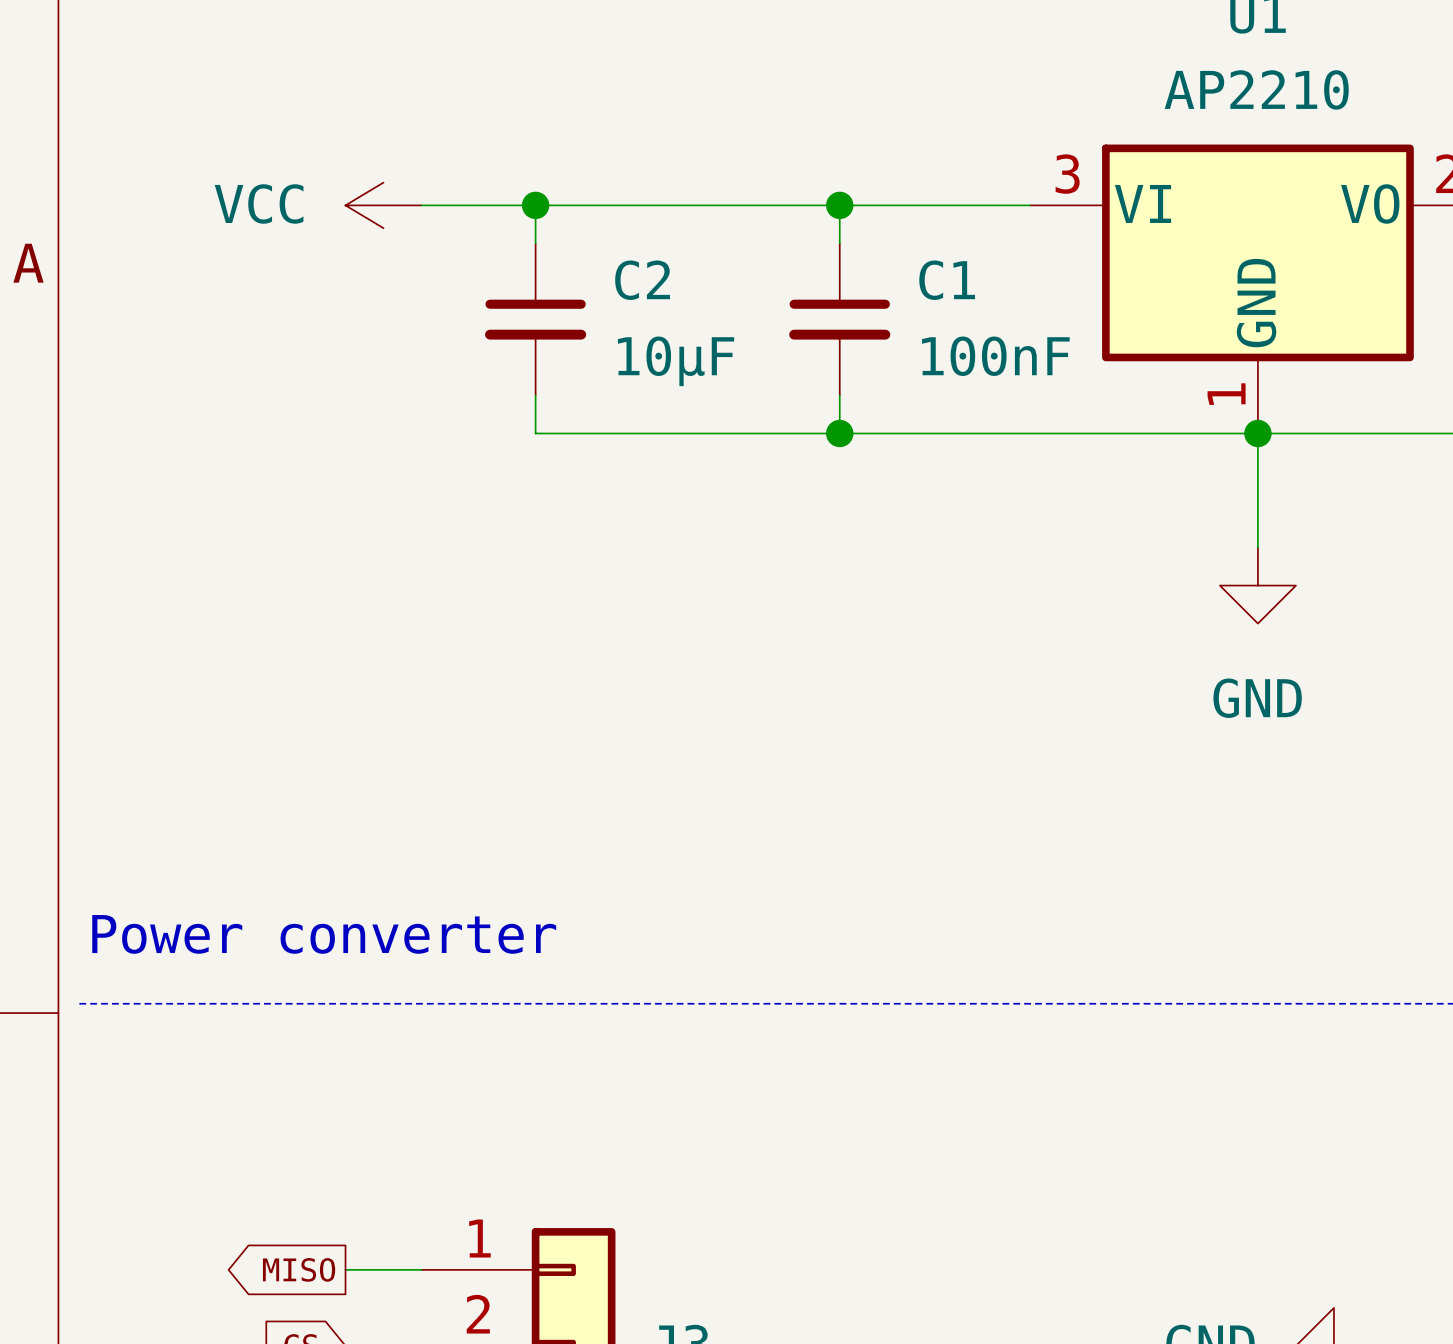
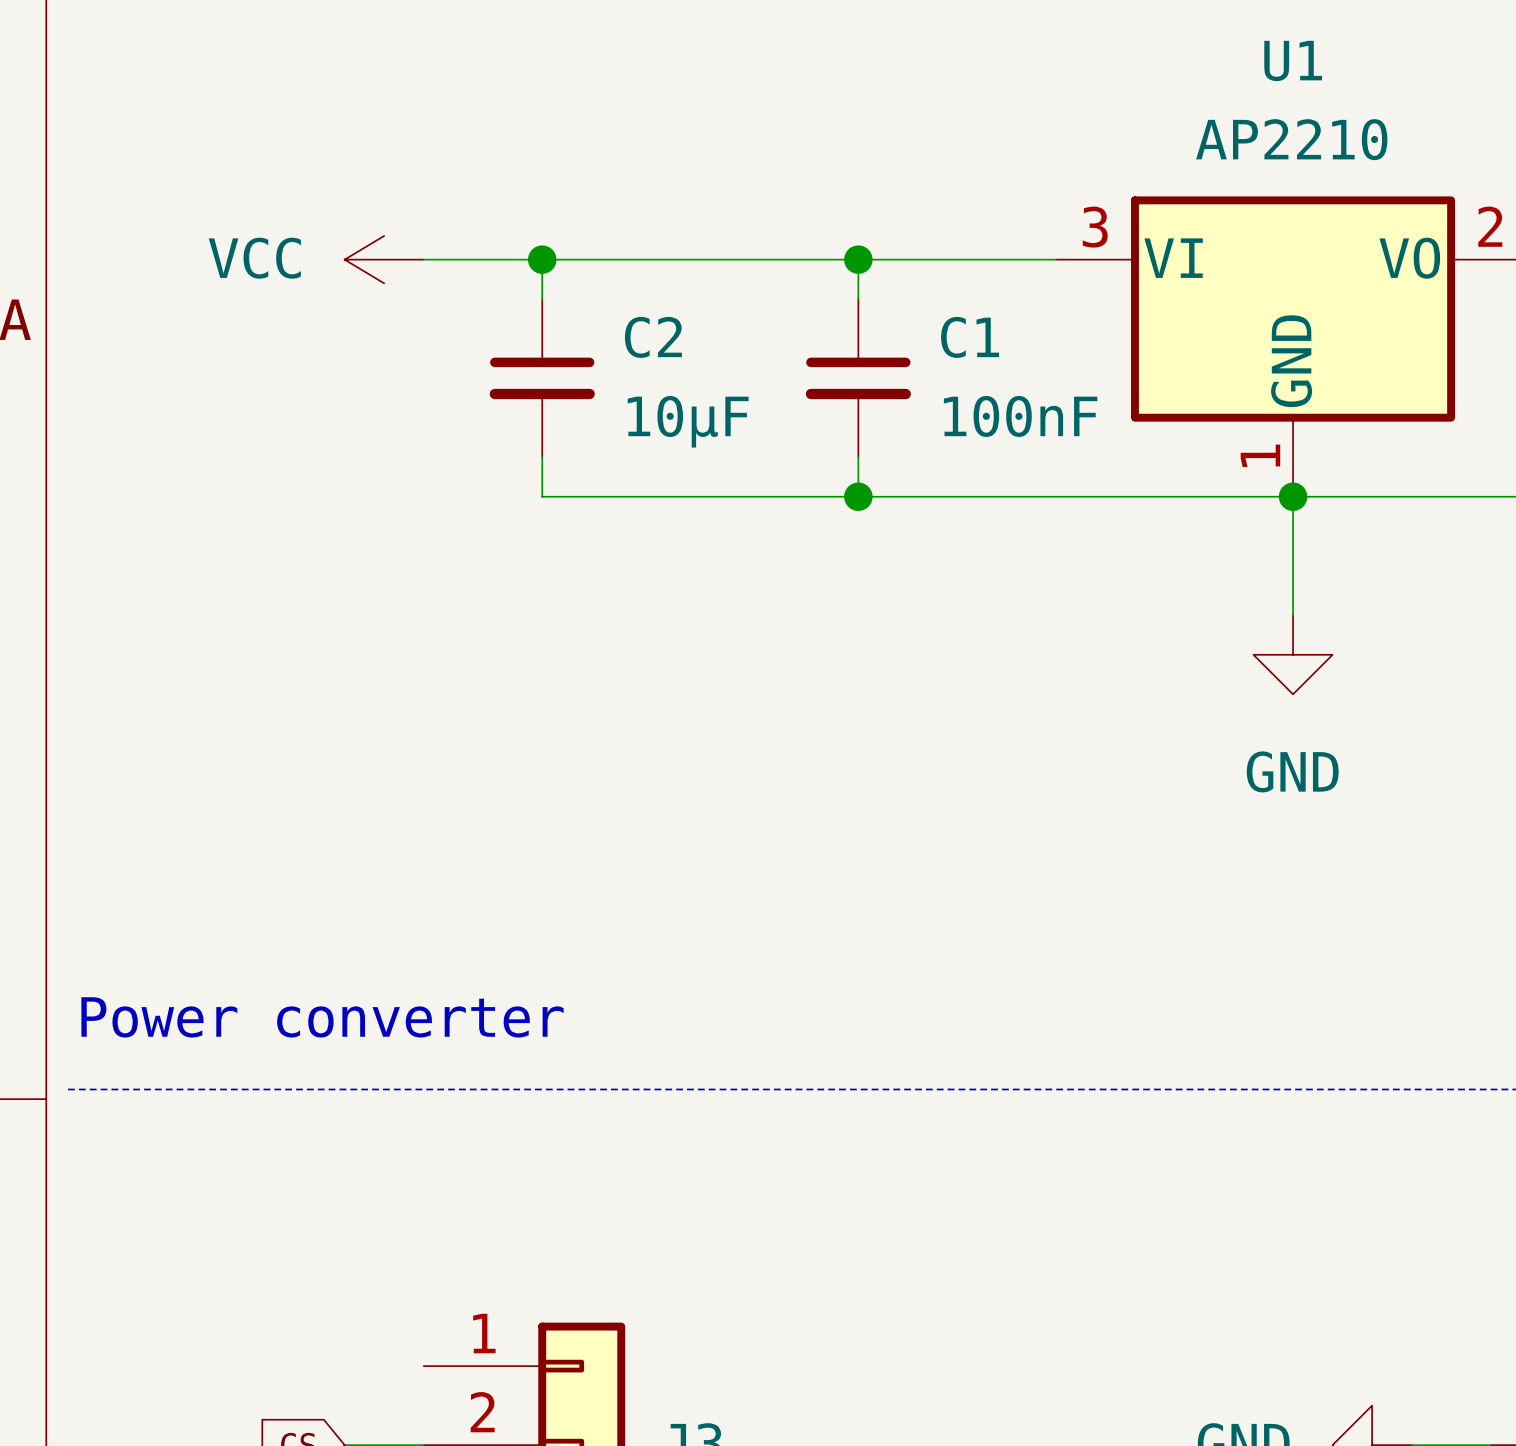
global label: MISO (299, 1269) -> none
wire: (345, 1269) (421, 1269) -> none

